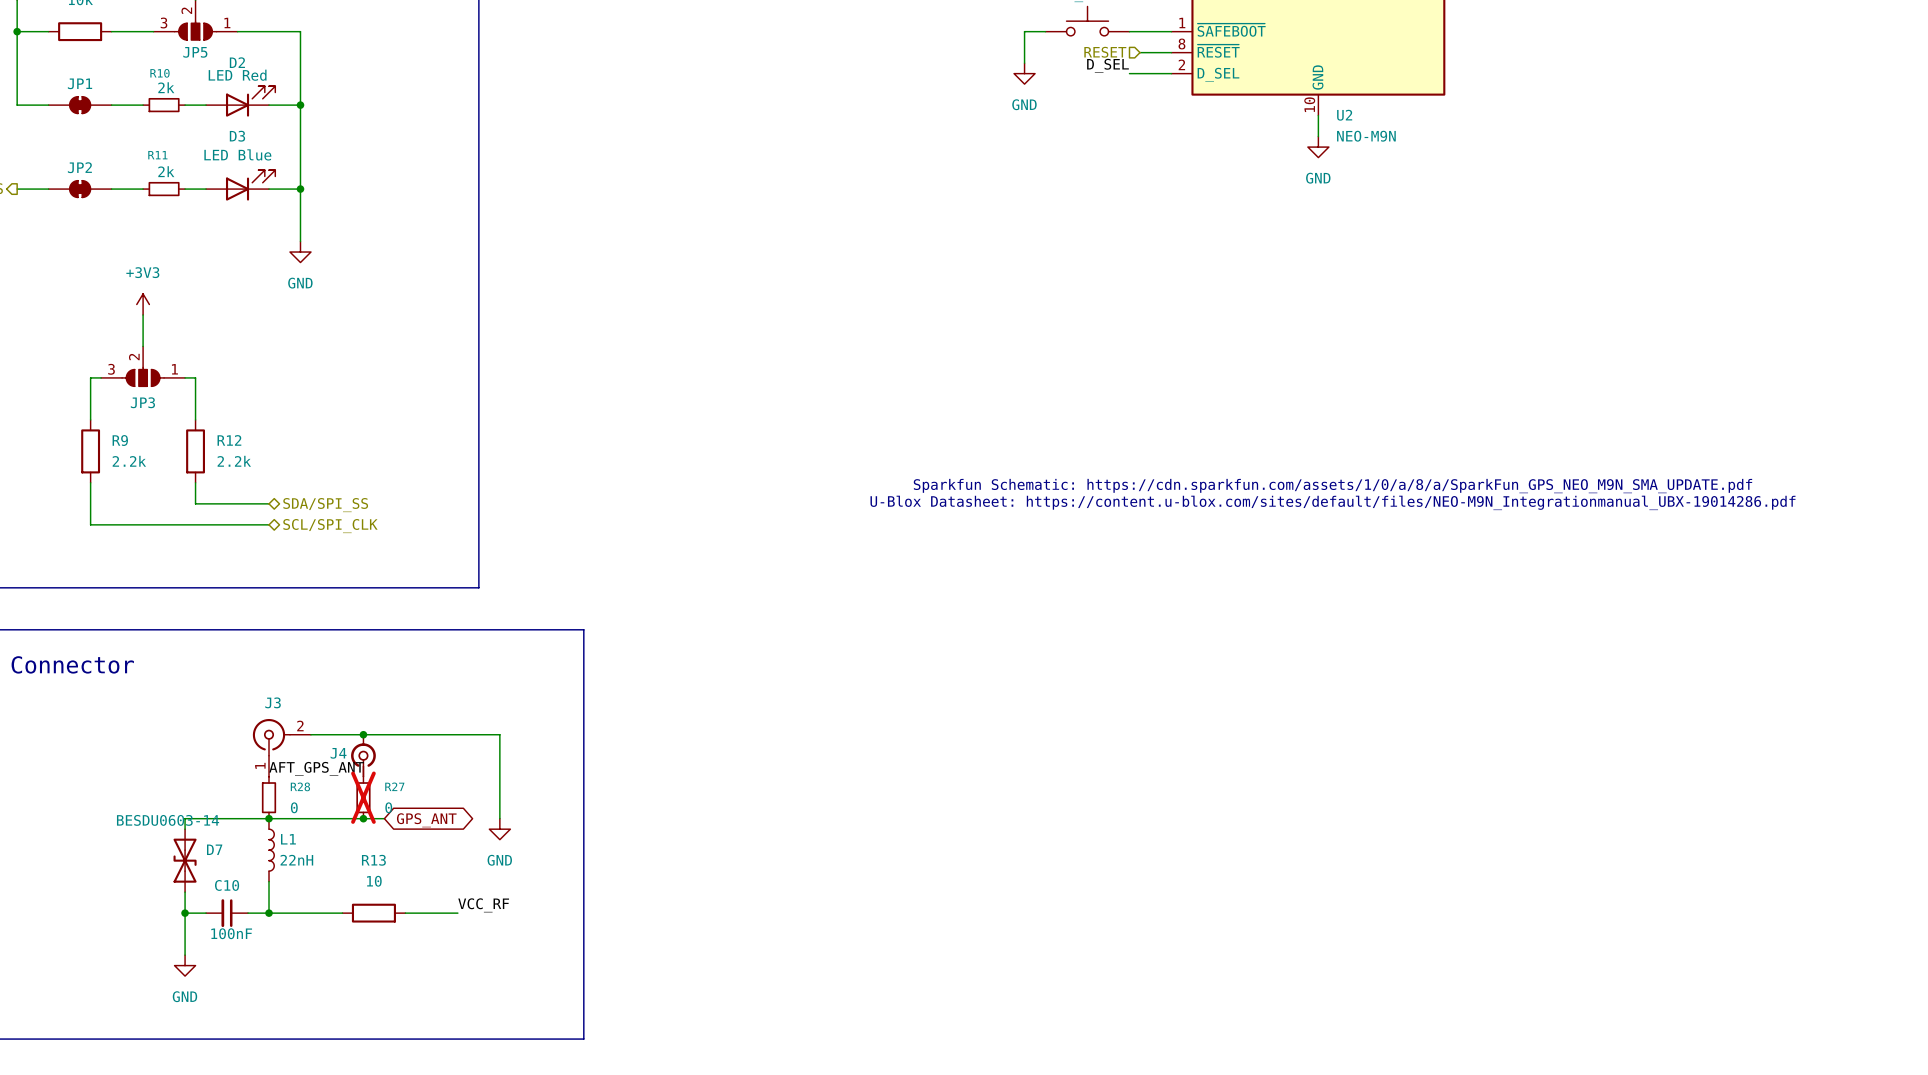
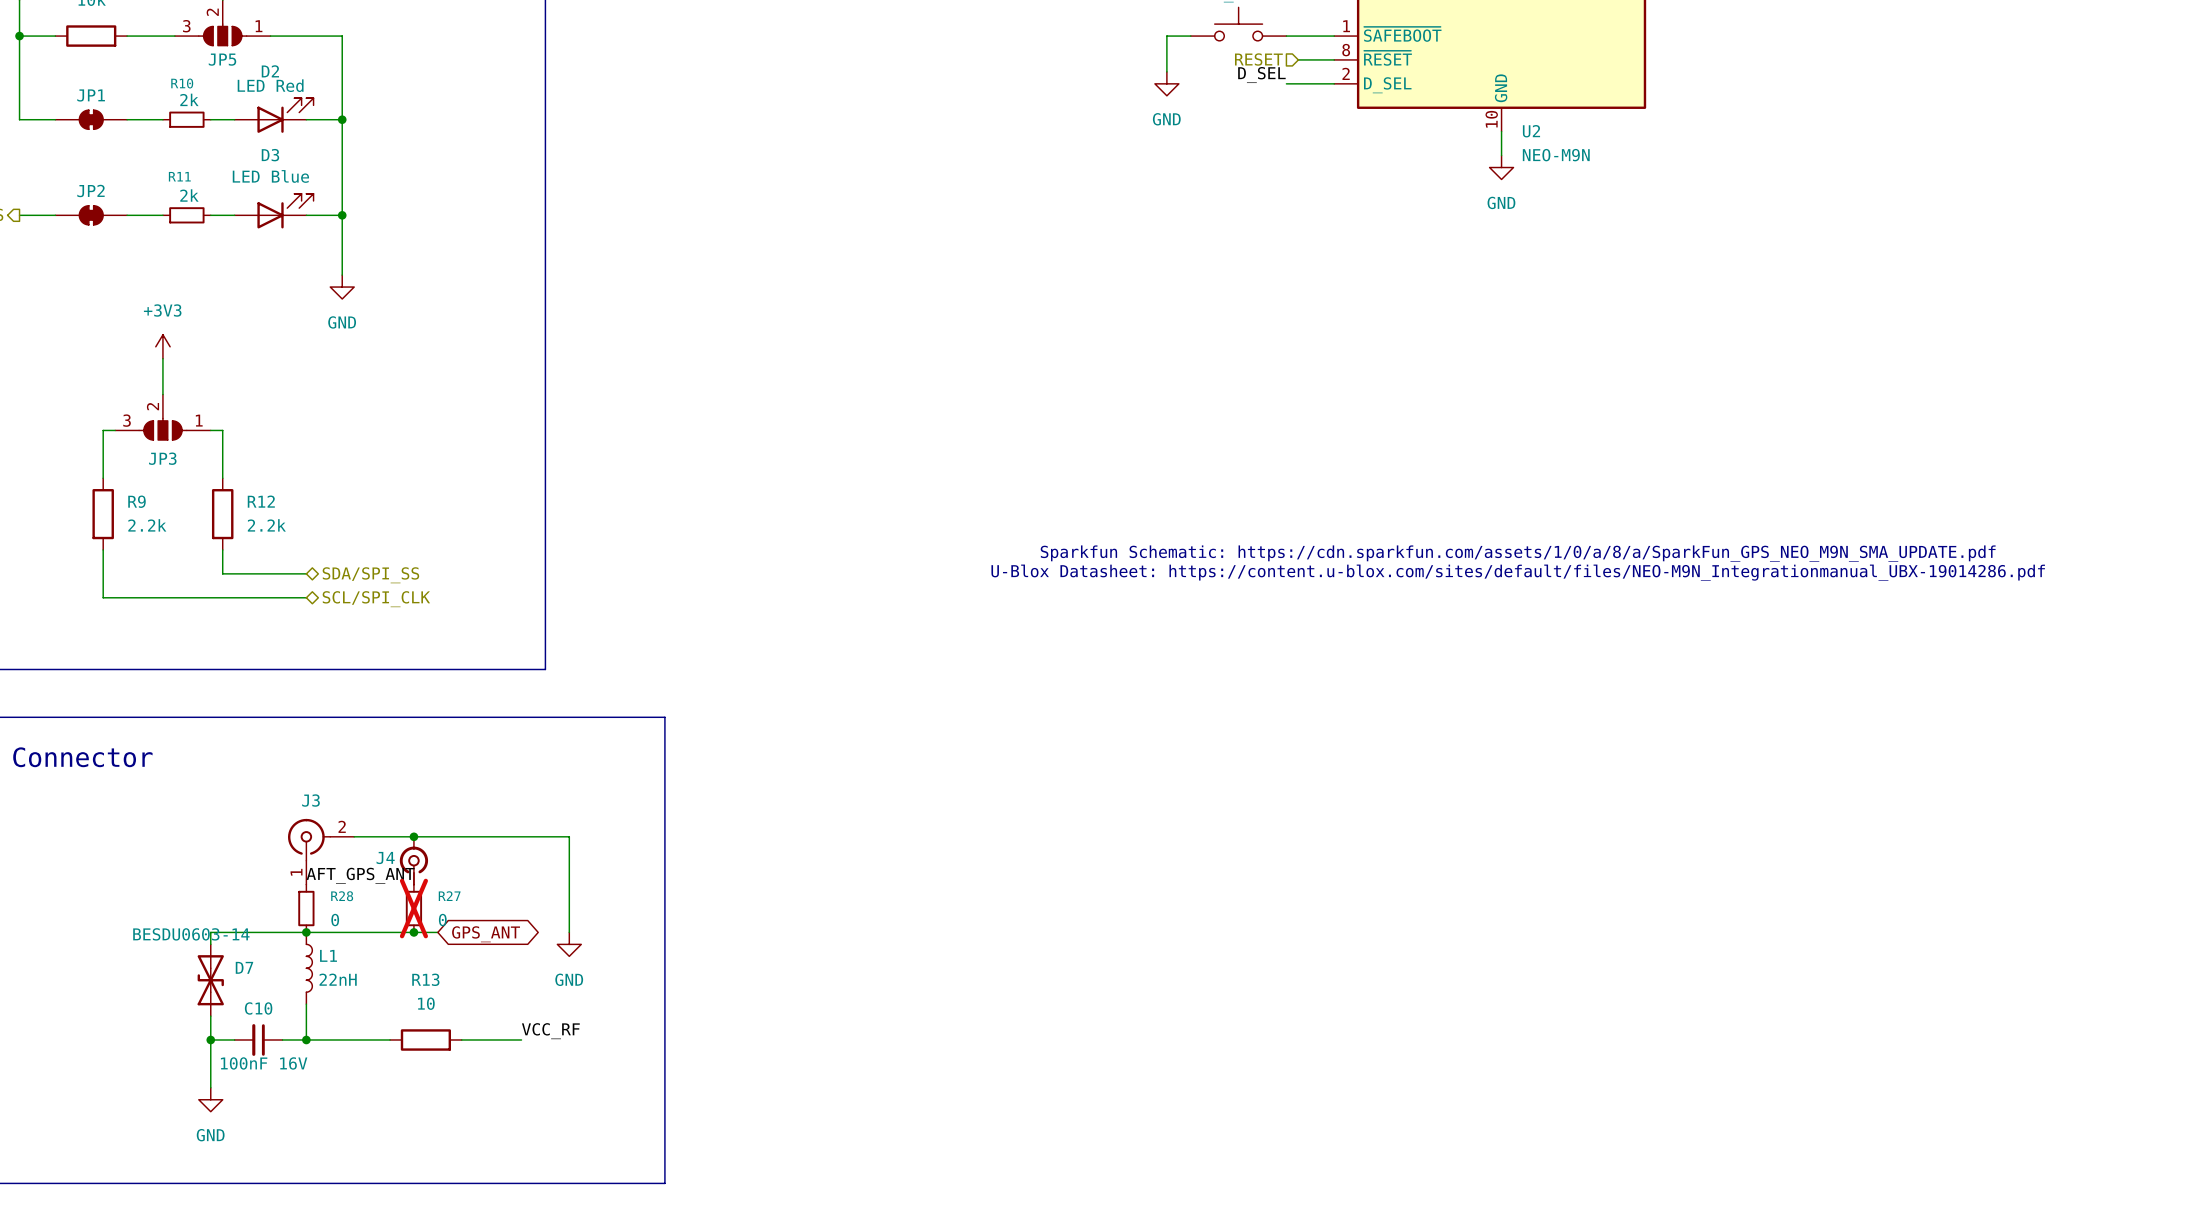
C10 value: 100nF (231, 933) -> 100nF 16V (264, 1063)

